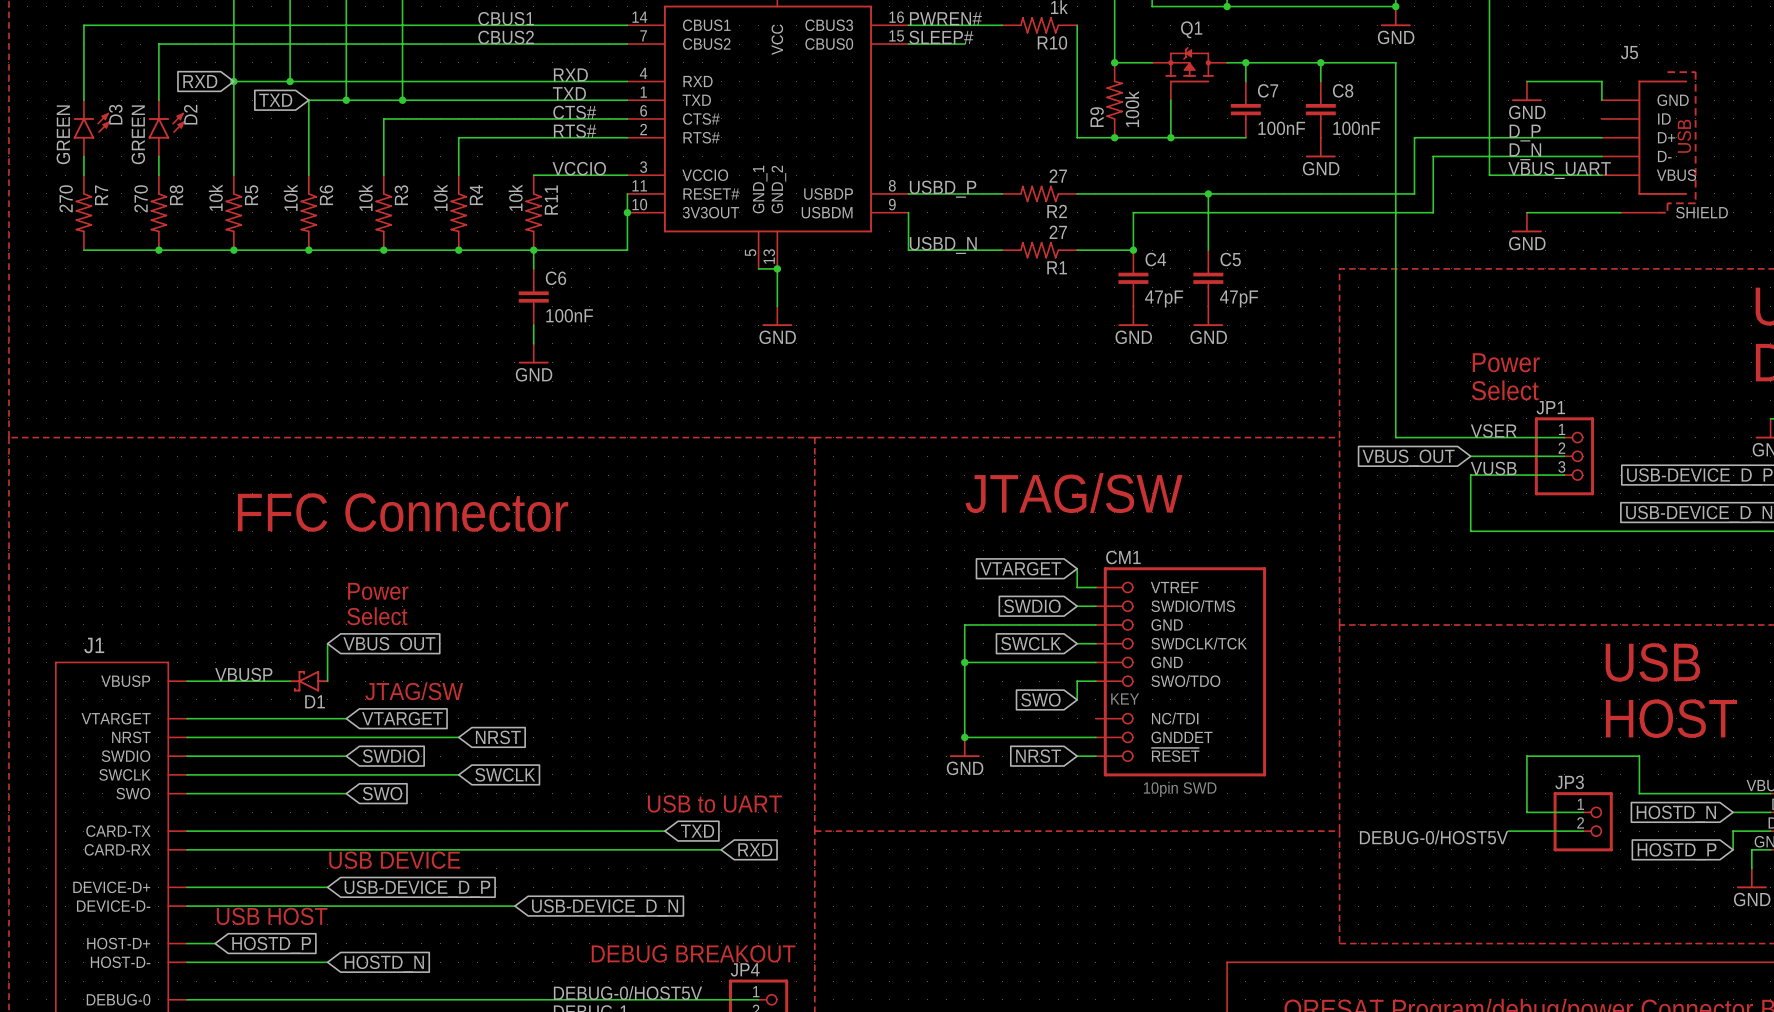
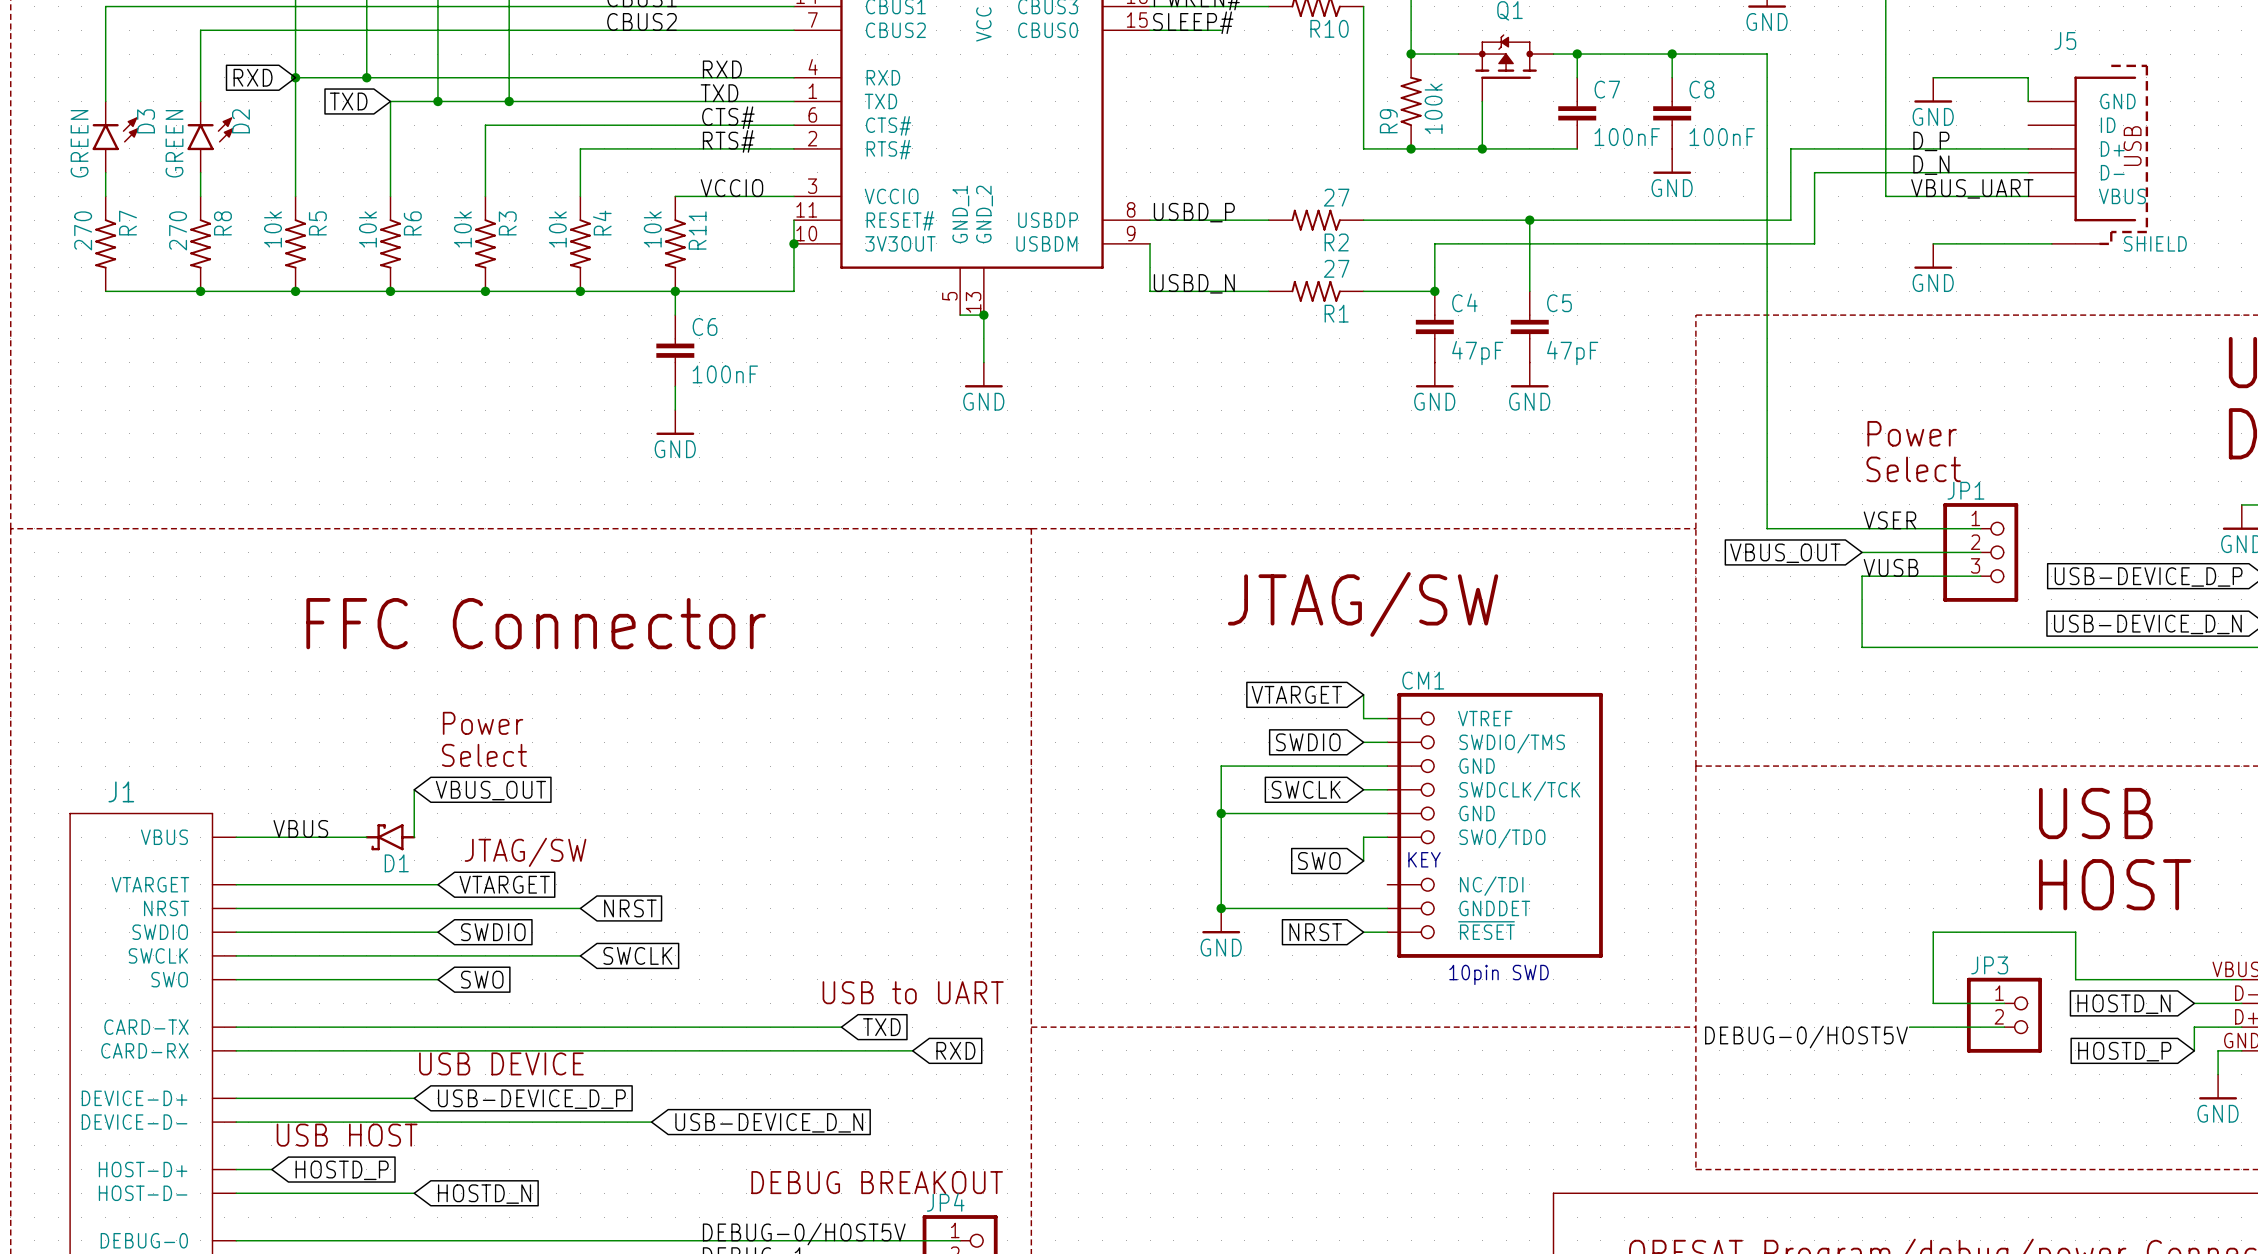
label: VBUSP (243, 674) -> VBUS (300, 828)
J1 pin name: VBUSP (125, 681) -> VBUS (164, 837)

